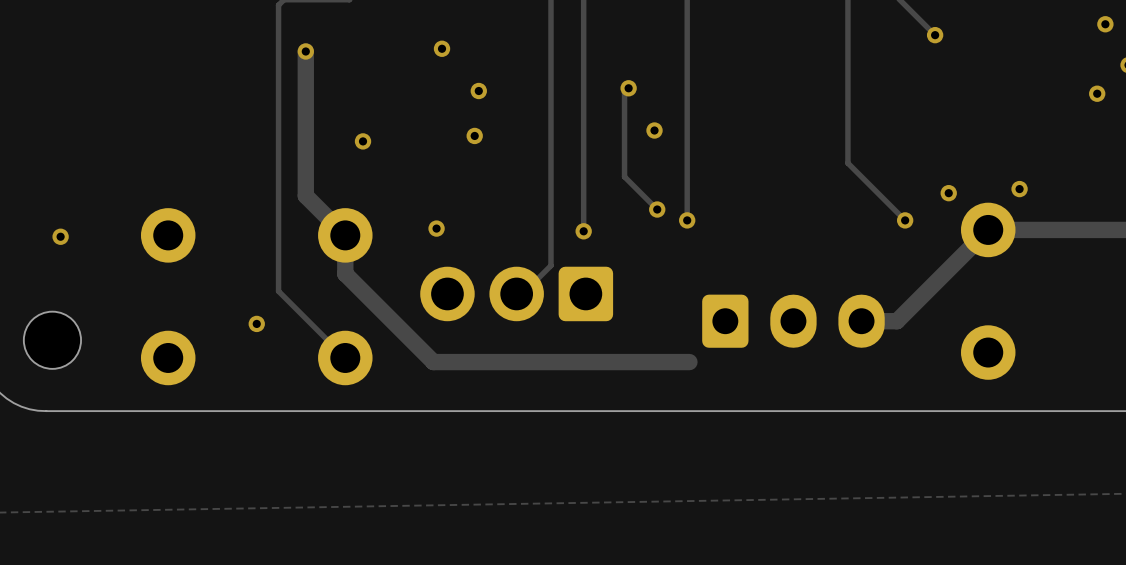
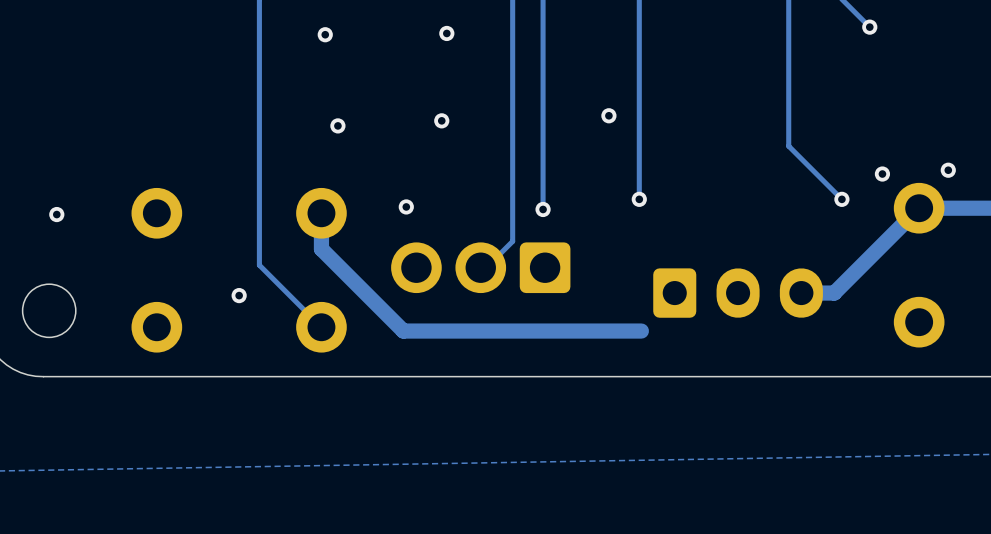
via: none -> (446, 33)
via: (442, 48) -> none
track: (305, 51) (305, 195) (345, 235) -> none
via position: (305, 51) -> (325, 34)
track: (628, 88) (624, 92) (624, 176) (657, 209) -> none
via: (628, 88) -> none
via: (478, 91) -> none
via: (657, 209) -> none

